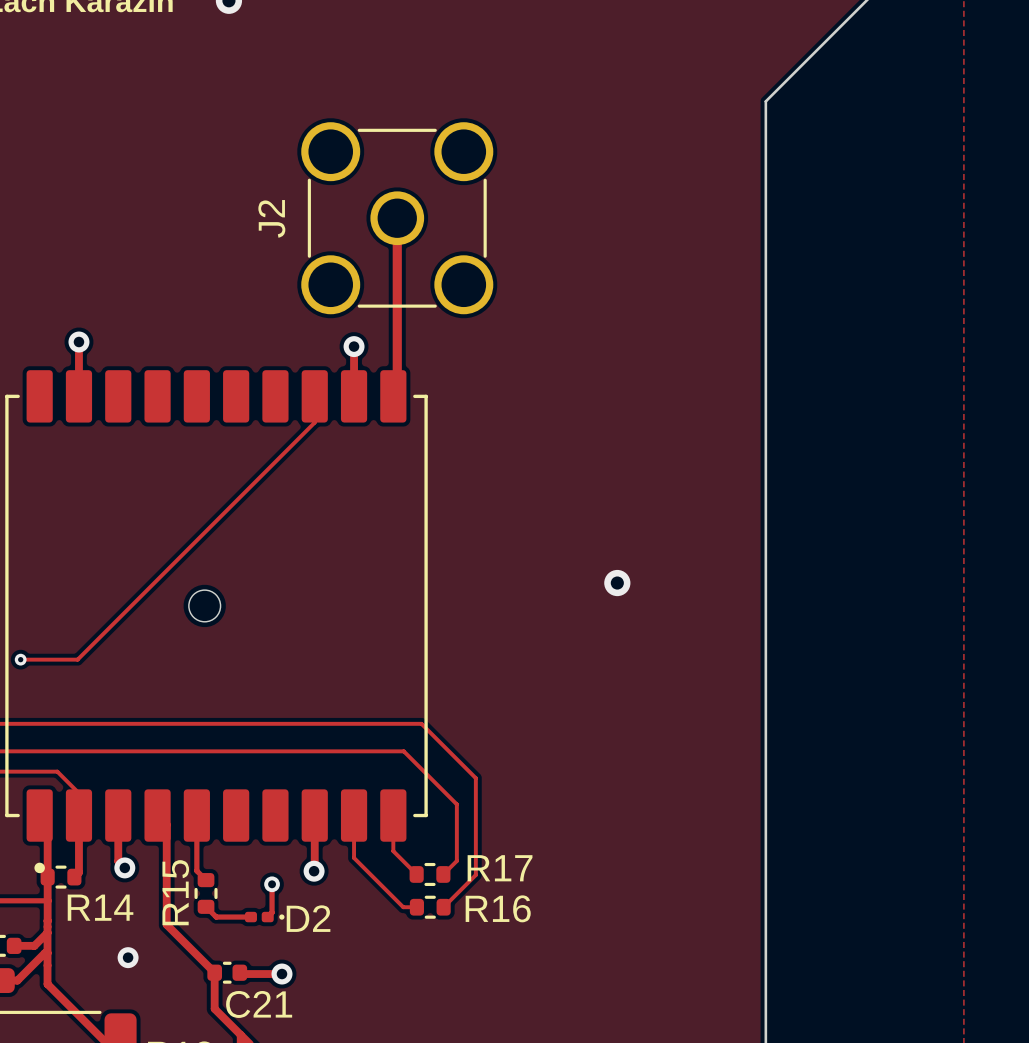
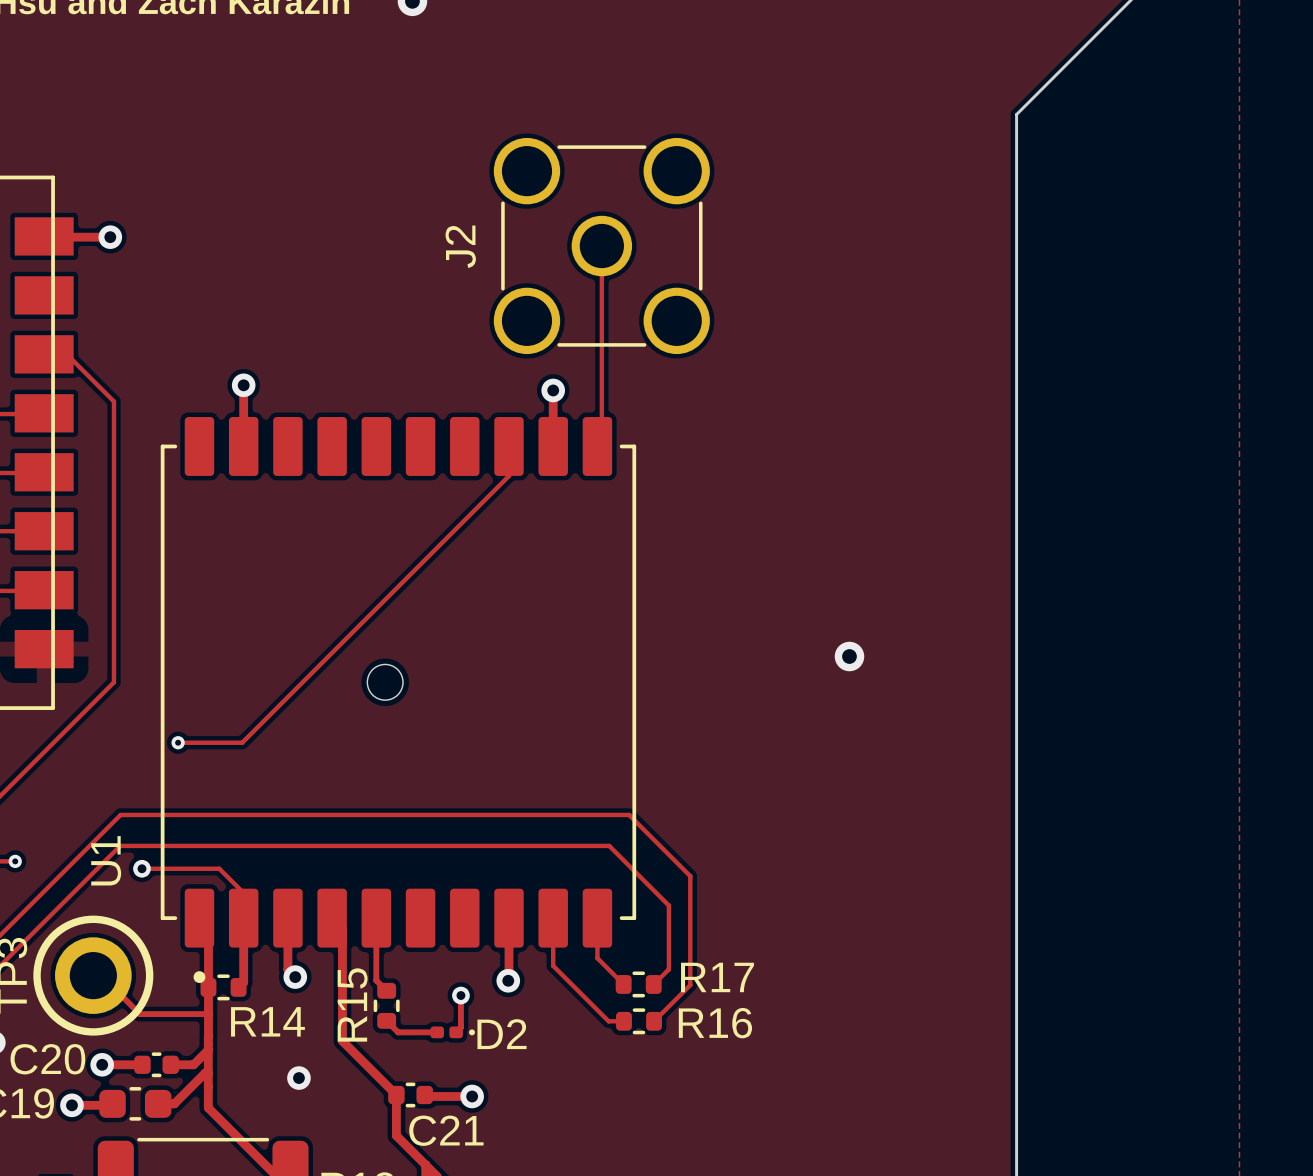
track width: thick (397, 218) (397, 392) -> thin (601, 246) (601, 442)

